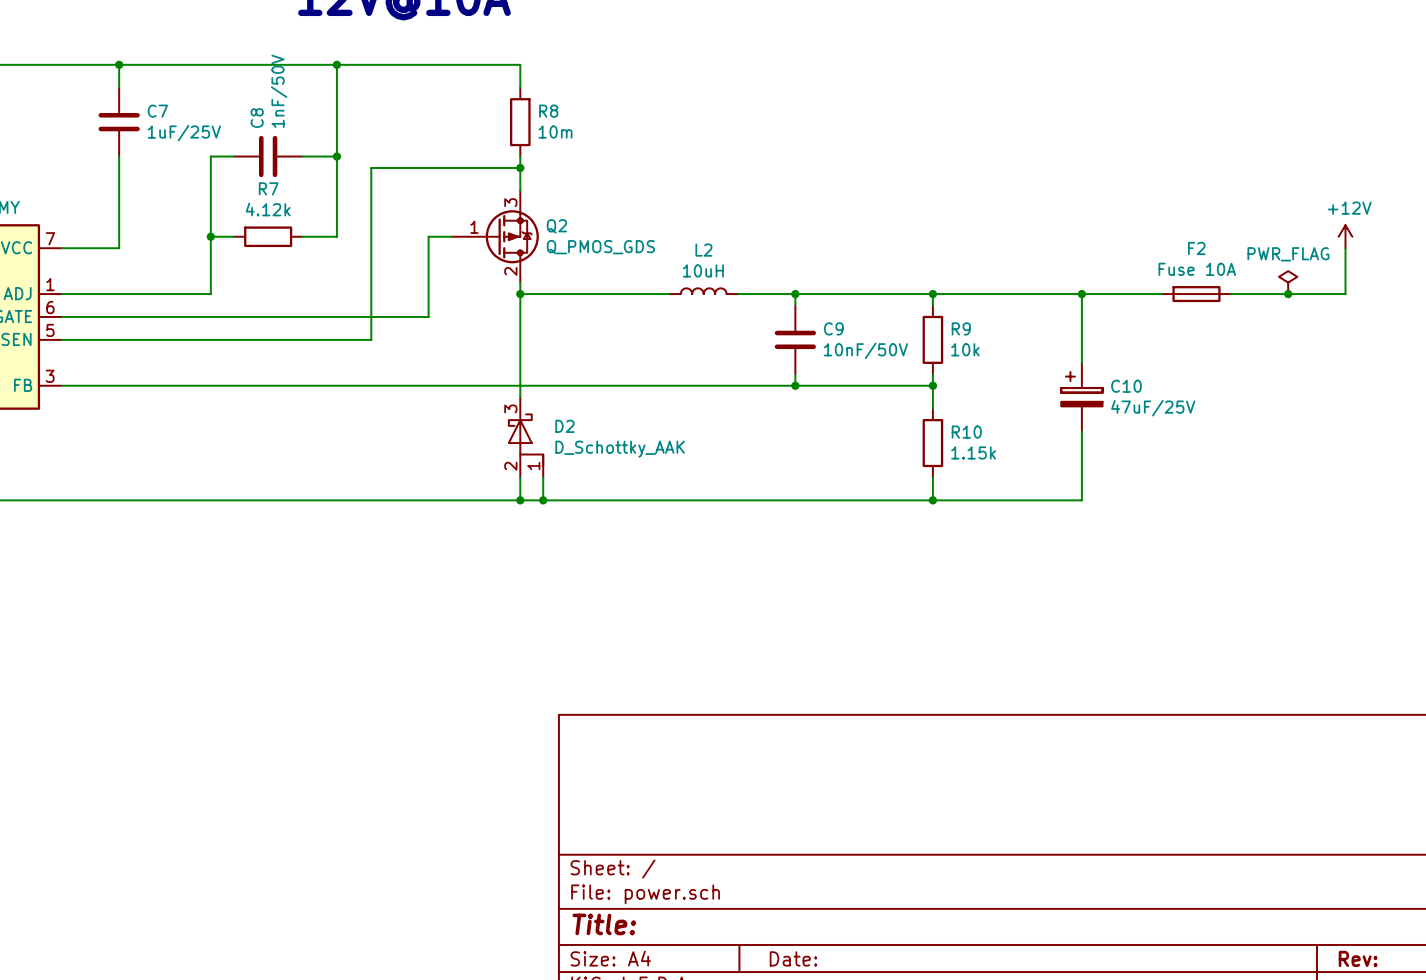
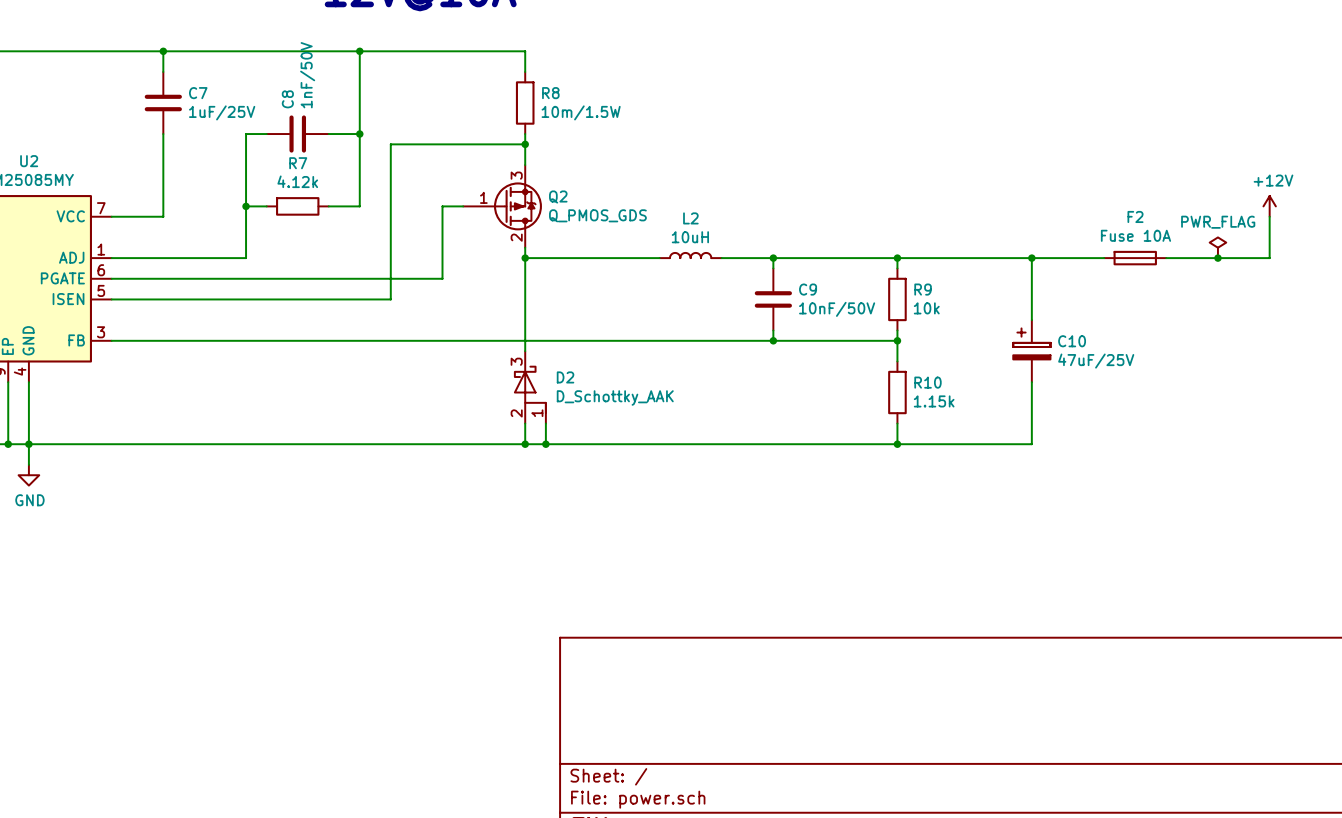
R8 value: 10m (555, 132) -> 10m/1.5W (581, 112)

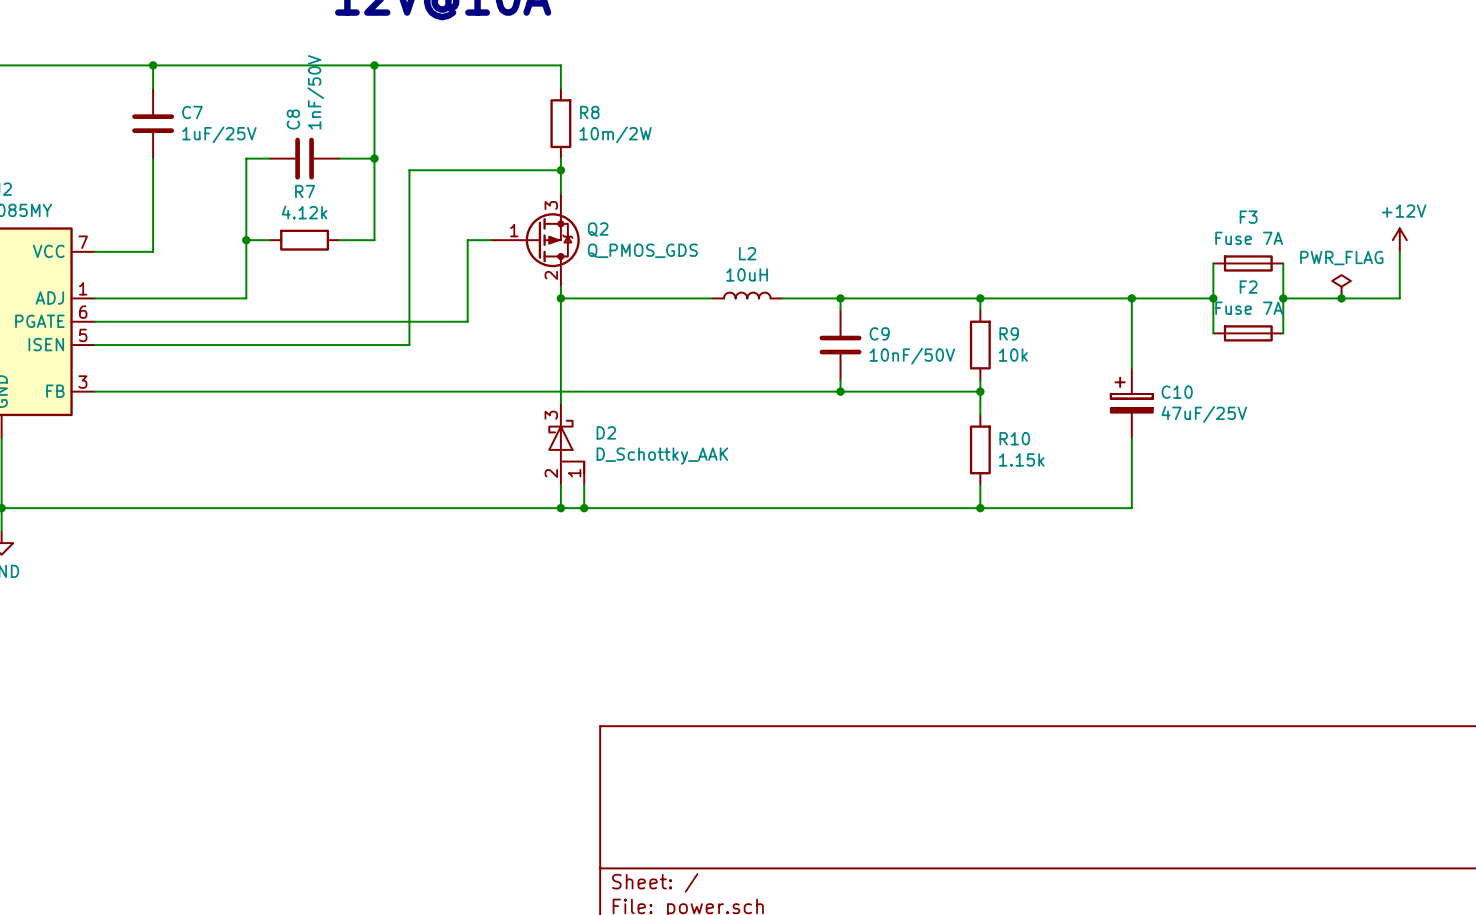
R8 value: 10m/1.5W (581, 112) -> 10m/2W (615, 134)
wire: none -> (1213, 263) (1213, 333)
F3: none -> Fuse 7A (1248, 263)
wire: none -> (1283, 263) (1283, 333)
F2 value: Fuse 10A (1135, 235) -> Fuse 7A (1249, 308)
junction: none -> (1213, 298)
F2 position: (1135, 258) -> (1248, 333)
junction: none -> (1283, 298)

